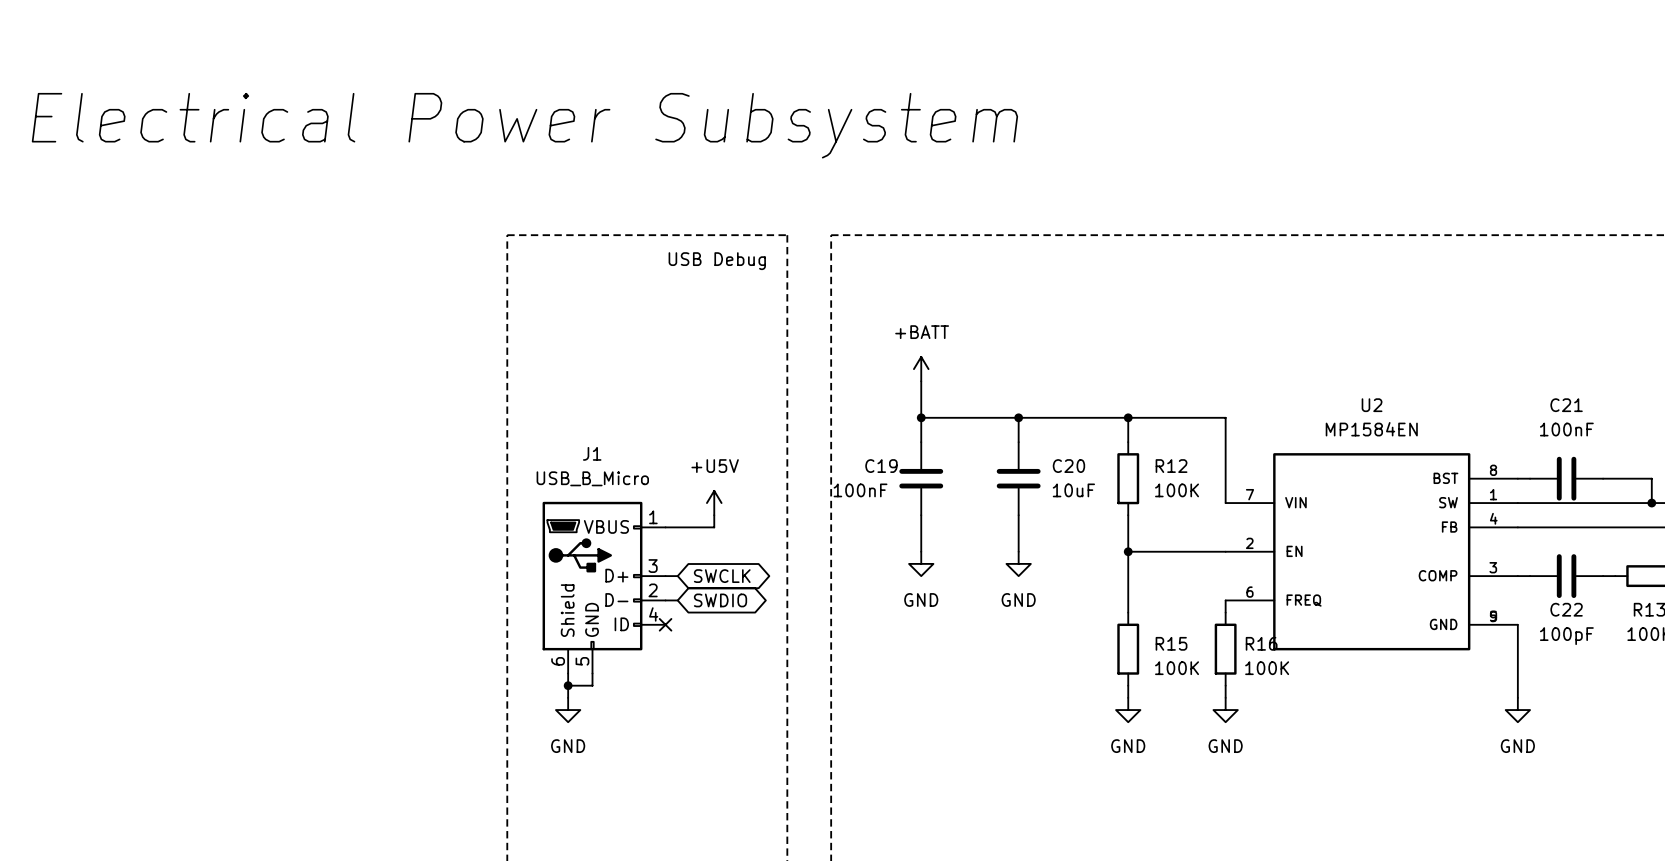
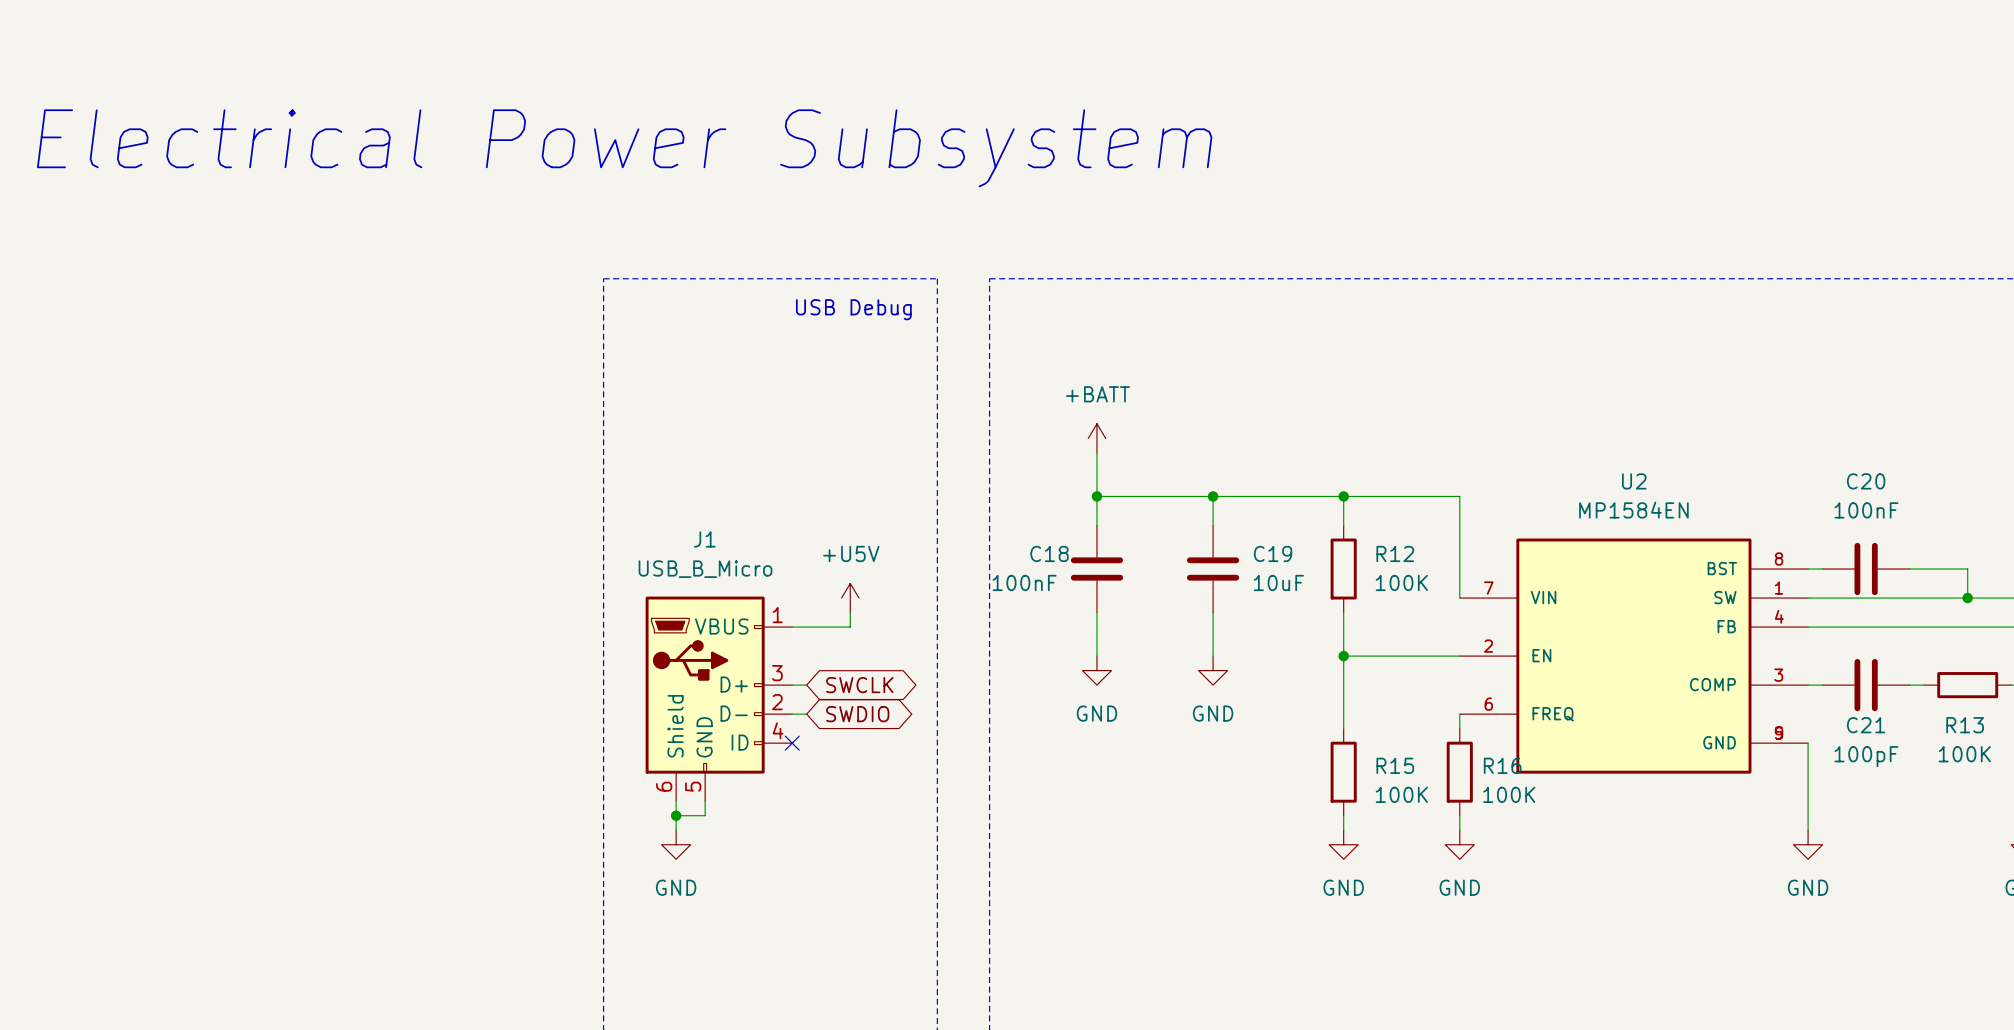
C21 name: C21 (1566, 405) -> C20 (1866, 481)
C19 name: C19 (881, 466) -> C18 (1049, 553)
C20 name: C20 (1068, 466) -> C19 (1273, 553)
C22 name: C22 (1566, 609) -> C21 (1866, 725)

